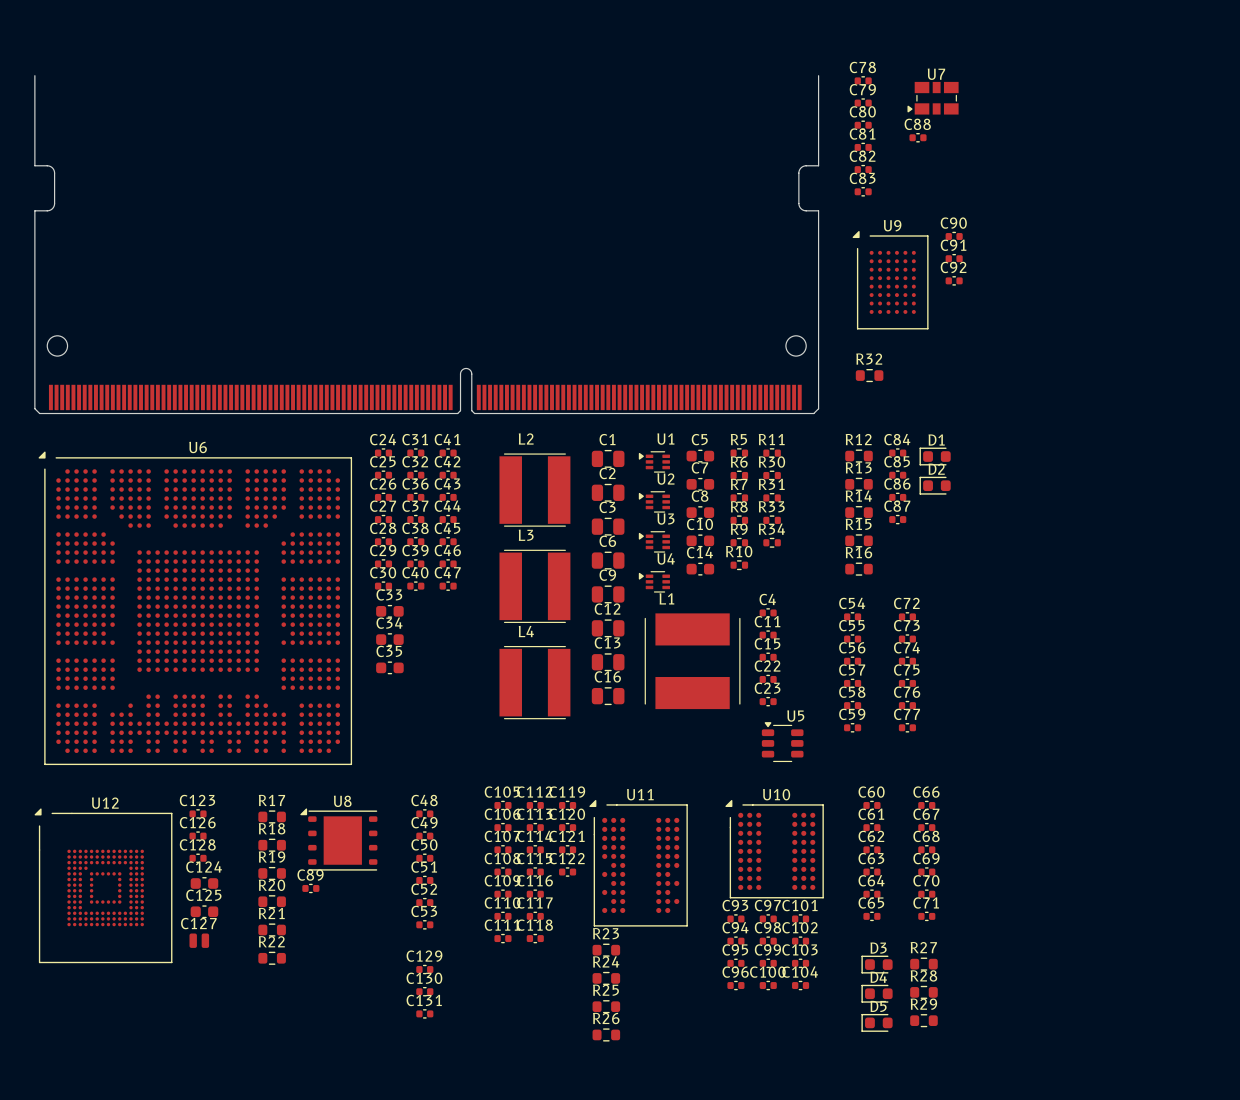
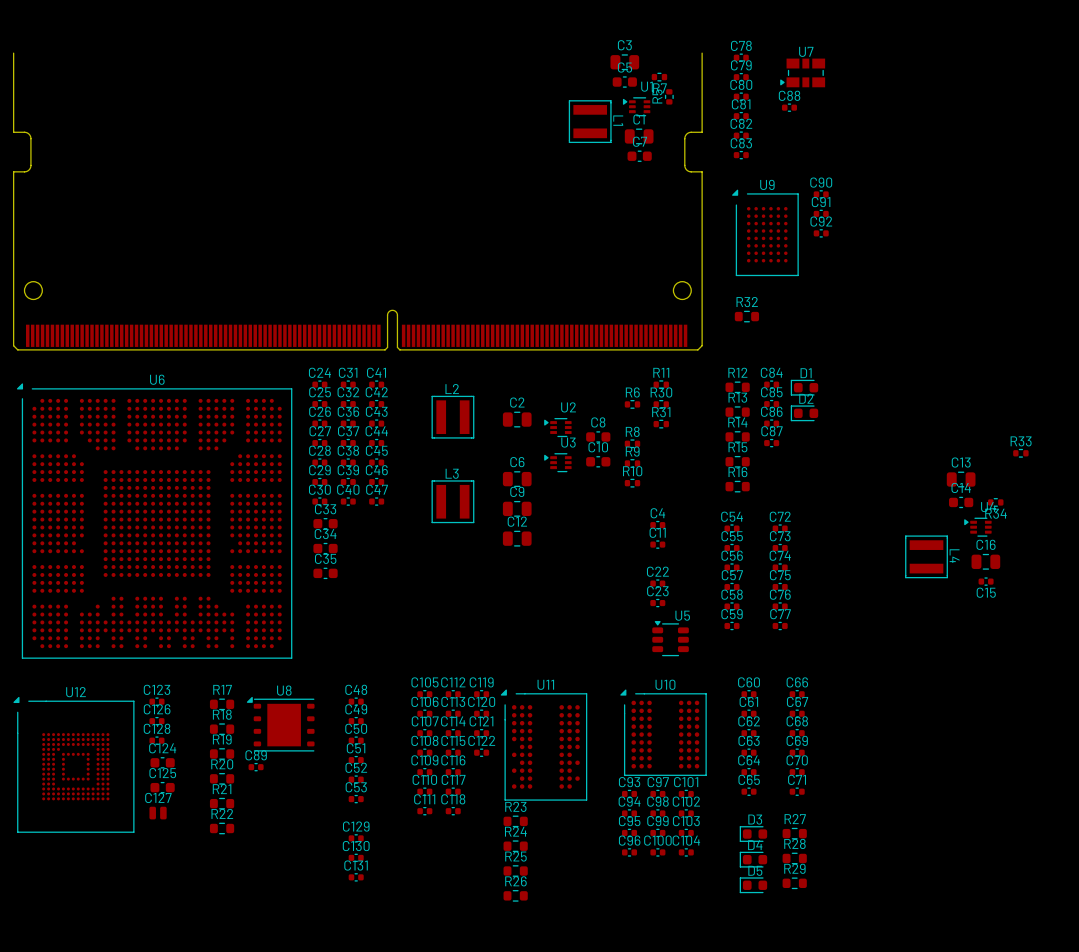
L2 footprint: [499, 453, 571, 527] -> [431, 395, 475, 439]
R5 rotation: 0° (739, 453) -> 90° clockwise (669, 96)
R5 position: (739, 453) -> (669, 96)
C5 position: (700, 456) -> (624, 82)
C1 position: (608, 458) -> (639, 136)
U1 position: (654, 461) -> (636, 106)
C7 position: (700, 484) -> (639, 156)
R7 name position: R7 (739, 484) -> R7 (659, 88)
R7 position: (739, 497) -> (659, 77)
R33 position: (772, 520) -> (1020, 453)
C3 position: (608, 526) -> (624, 62)
R34 name position: R34 (771, 529) -> R34 (996, 513)
R34 position: (772, 542) -> (995, 502)
L3 footprint: [499, 549, 571, 623] -> [431, 480, 475, 524]
C14 position: (700, 569) -> (961, 502)
U4 position: (654, 581) -> (977, 527)
L1 name position: L1 (666, 598) -> L1 (618, 120)
L1 footprint: [644, 613, 741, 710] -> [568, 100, 612, 143]
L4 name position: L4 (526, 631) -> L4 (954, 556)
C15 name position: C15 (767, 643) -> C15 (986, 592)
L4 footprint: [499, 646, 571, 720] -> [905, 535, 948, 579]
C15 position: (768, 657) -> (986, 581)
C13 position: (608, 662) -> (961, 479)
C16 position: (608, 696) -> (985, 561)

